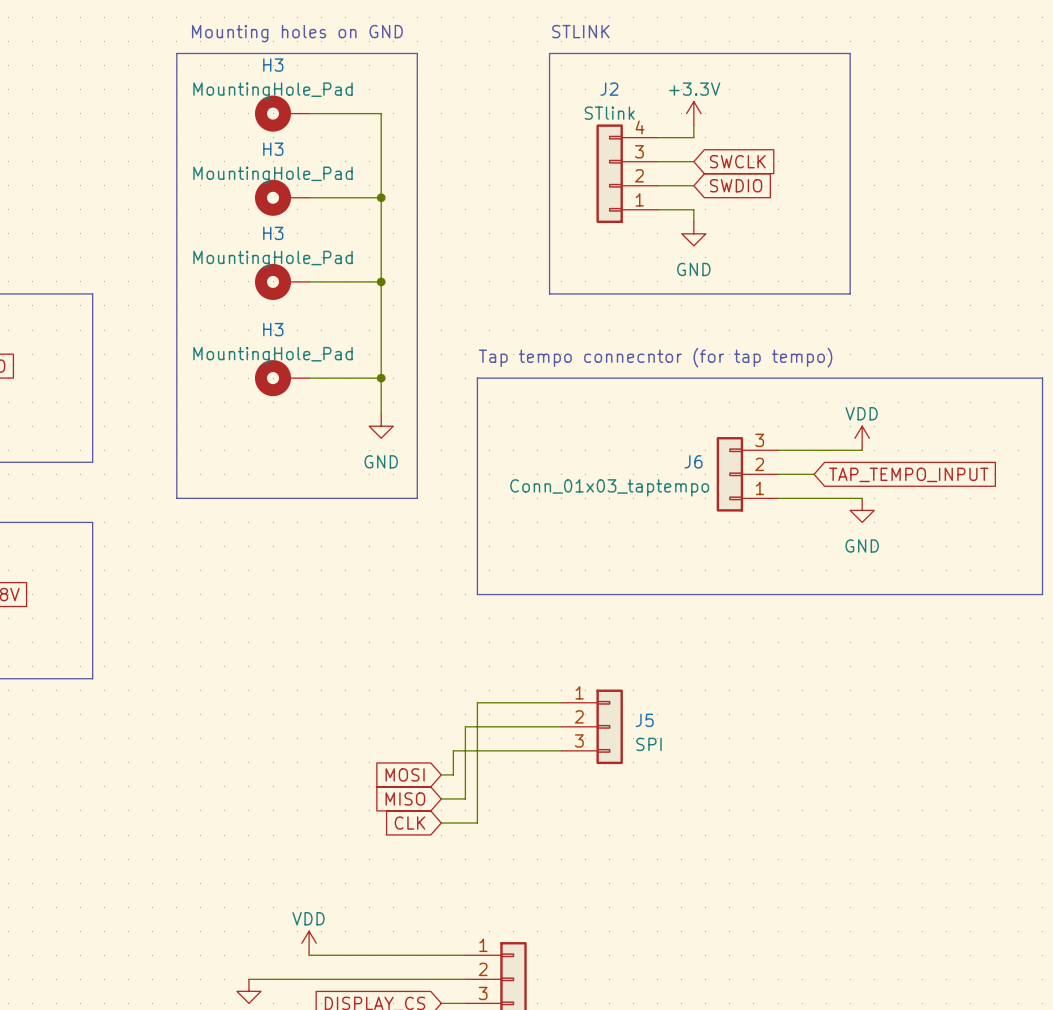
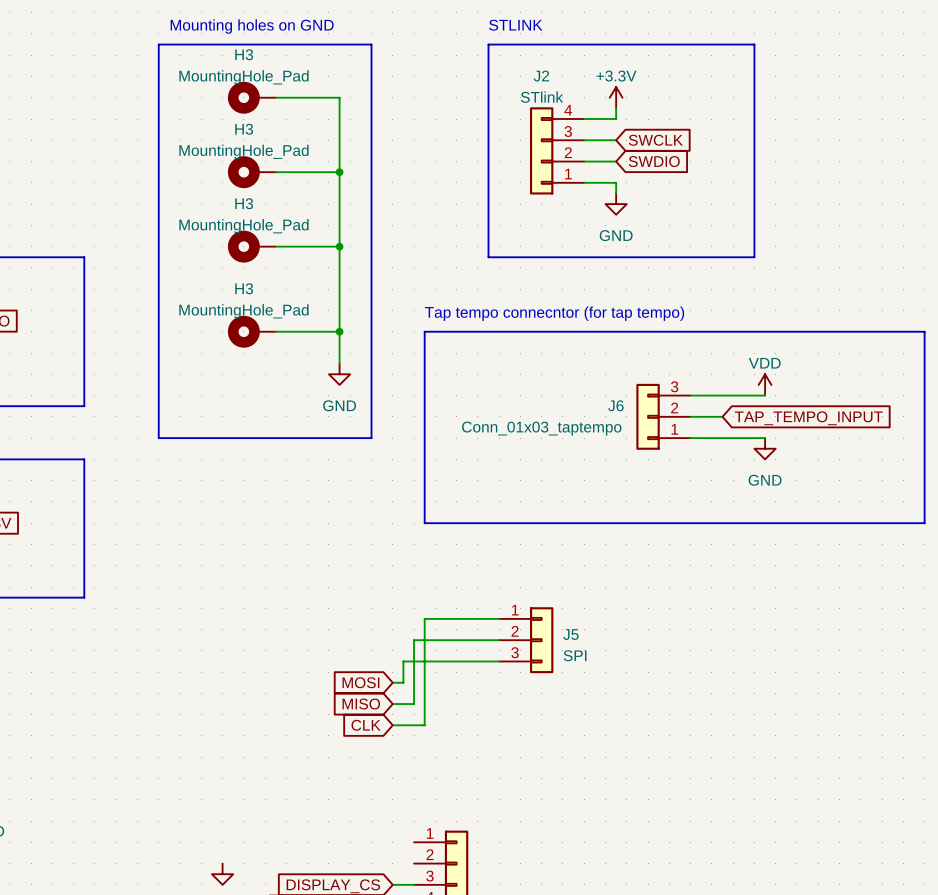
power symbol: VDD (309, 943) -> none
wire: (309, 955) (465, 955) -> none
wire: (248, 979) (465, 979) -> none

